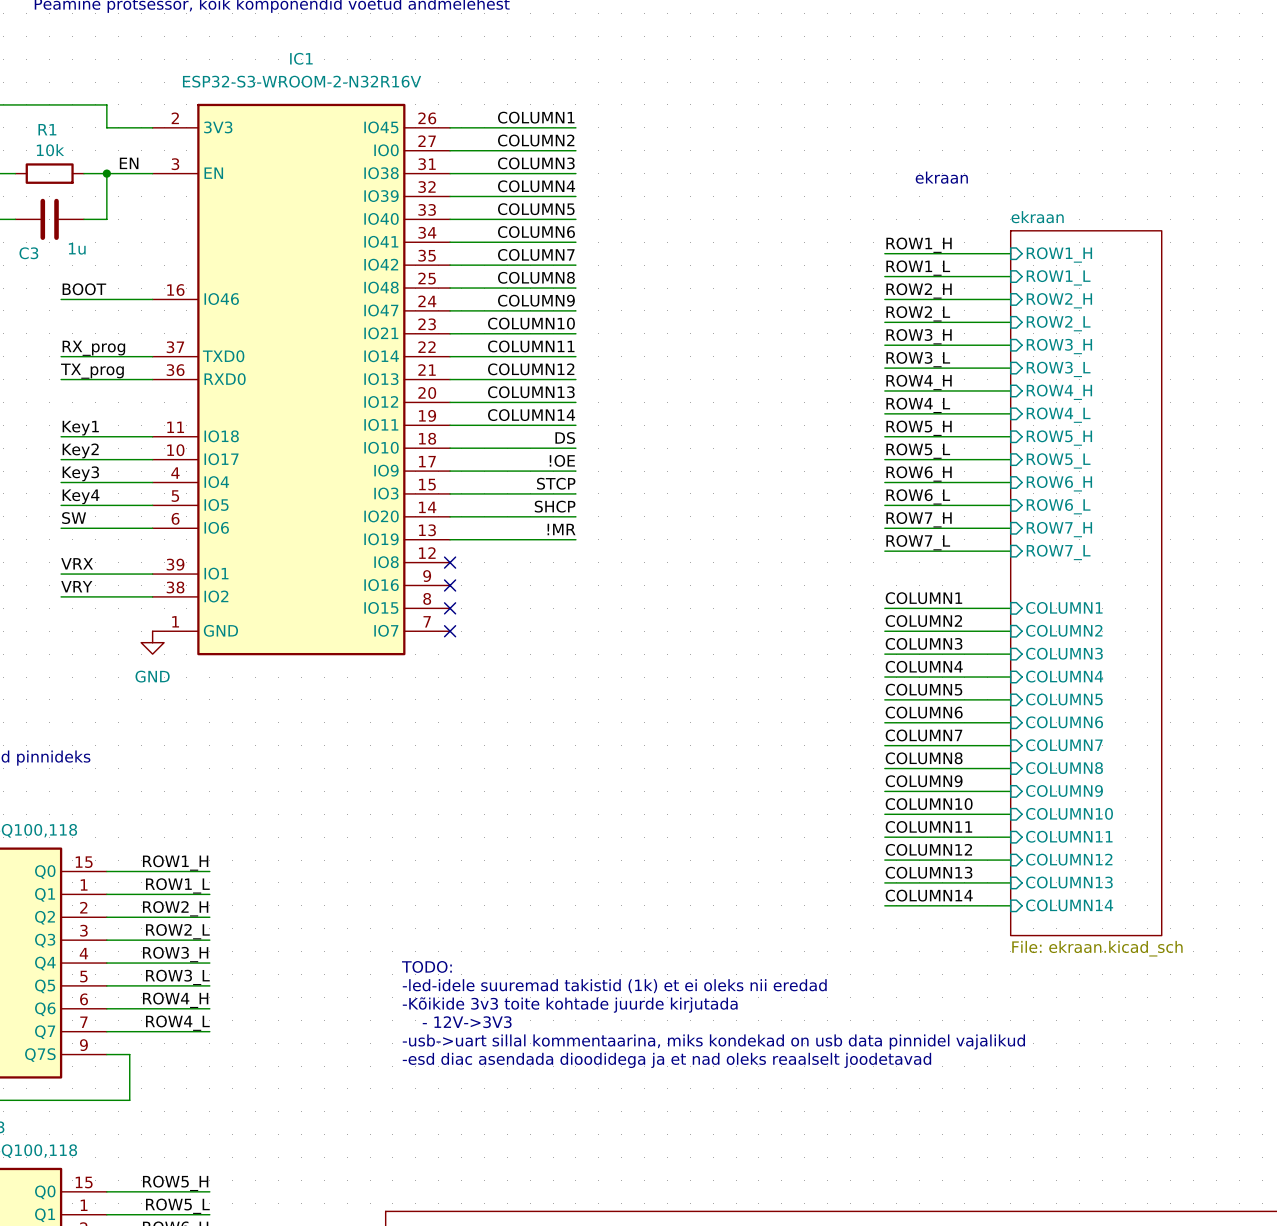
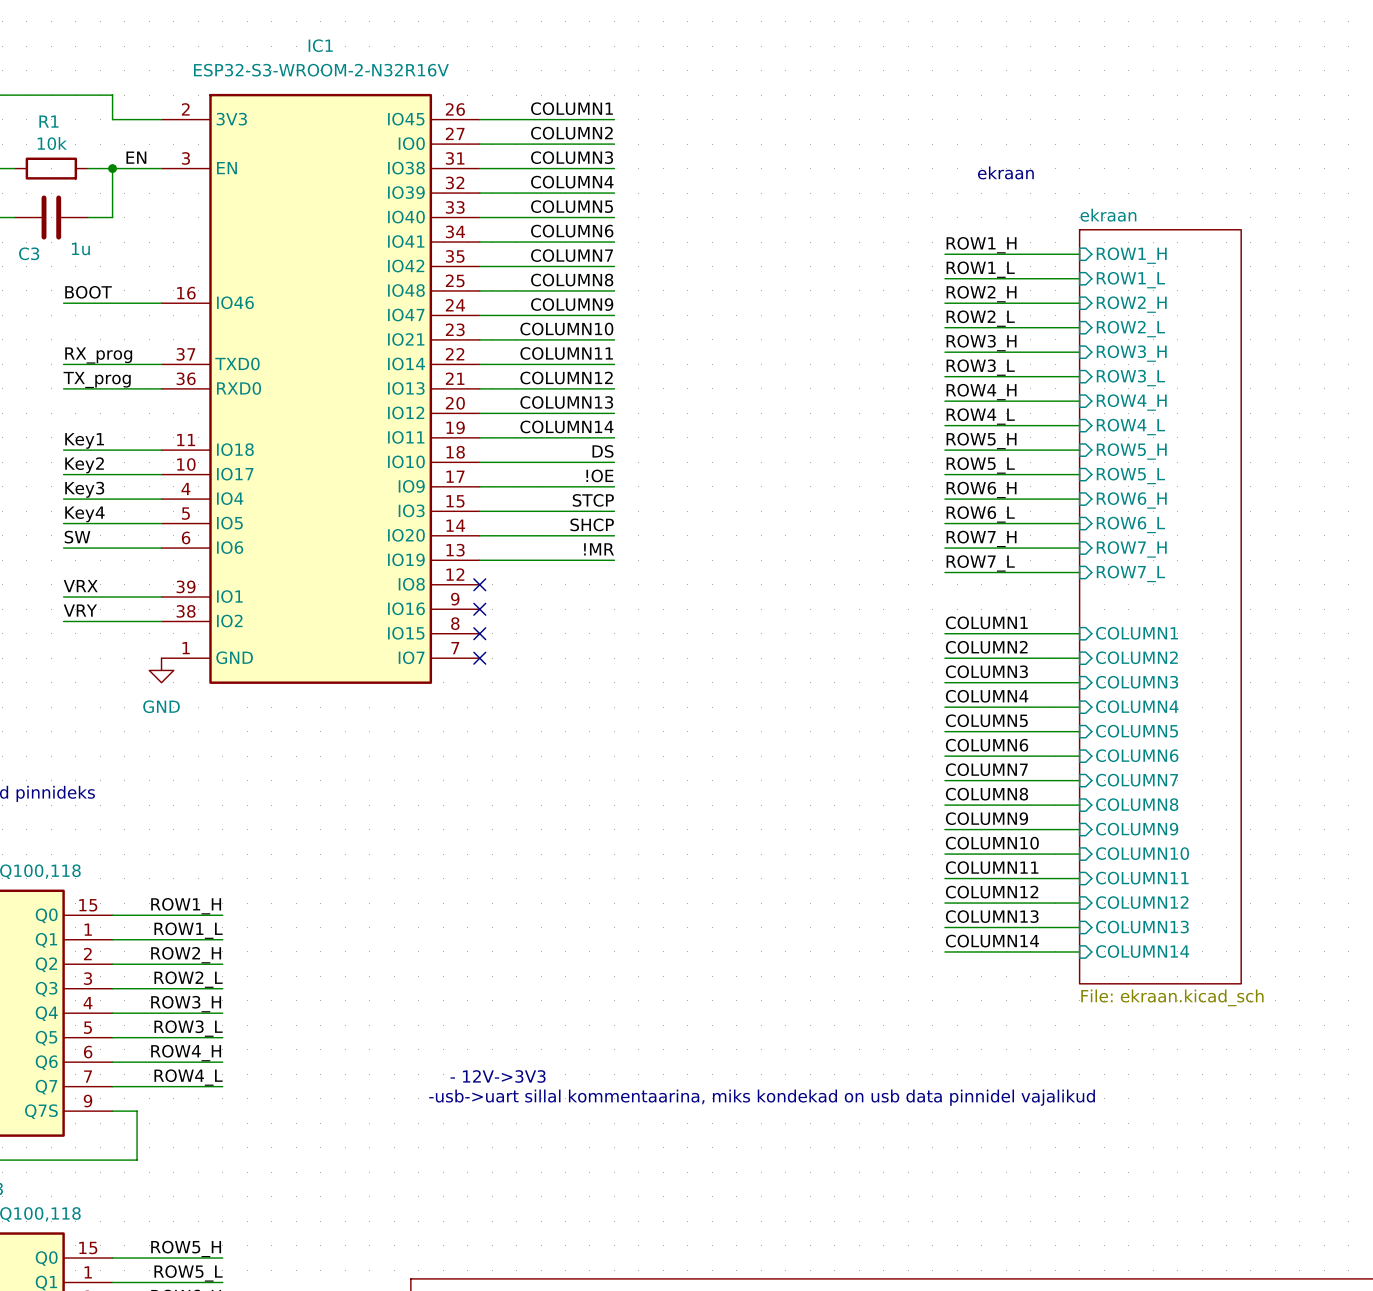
text: TODO: (426, 966) -> none
text: -led-idele suuremad takistid (1k) et ei oleks nii eredad (614, 986) -> none
text: -Kõikide 3v3 toite kohtade juurde kirjutada (570, 1005) -> none
text: -esd diac asendada dioodidega ja et nad oleks reaalselt joodetavad (666, 1060) -> none

